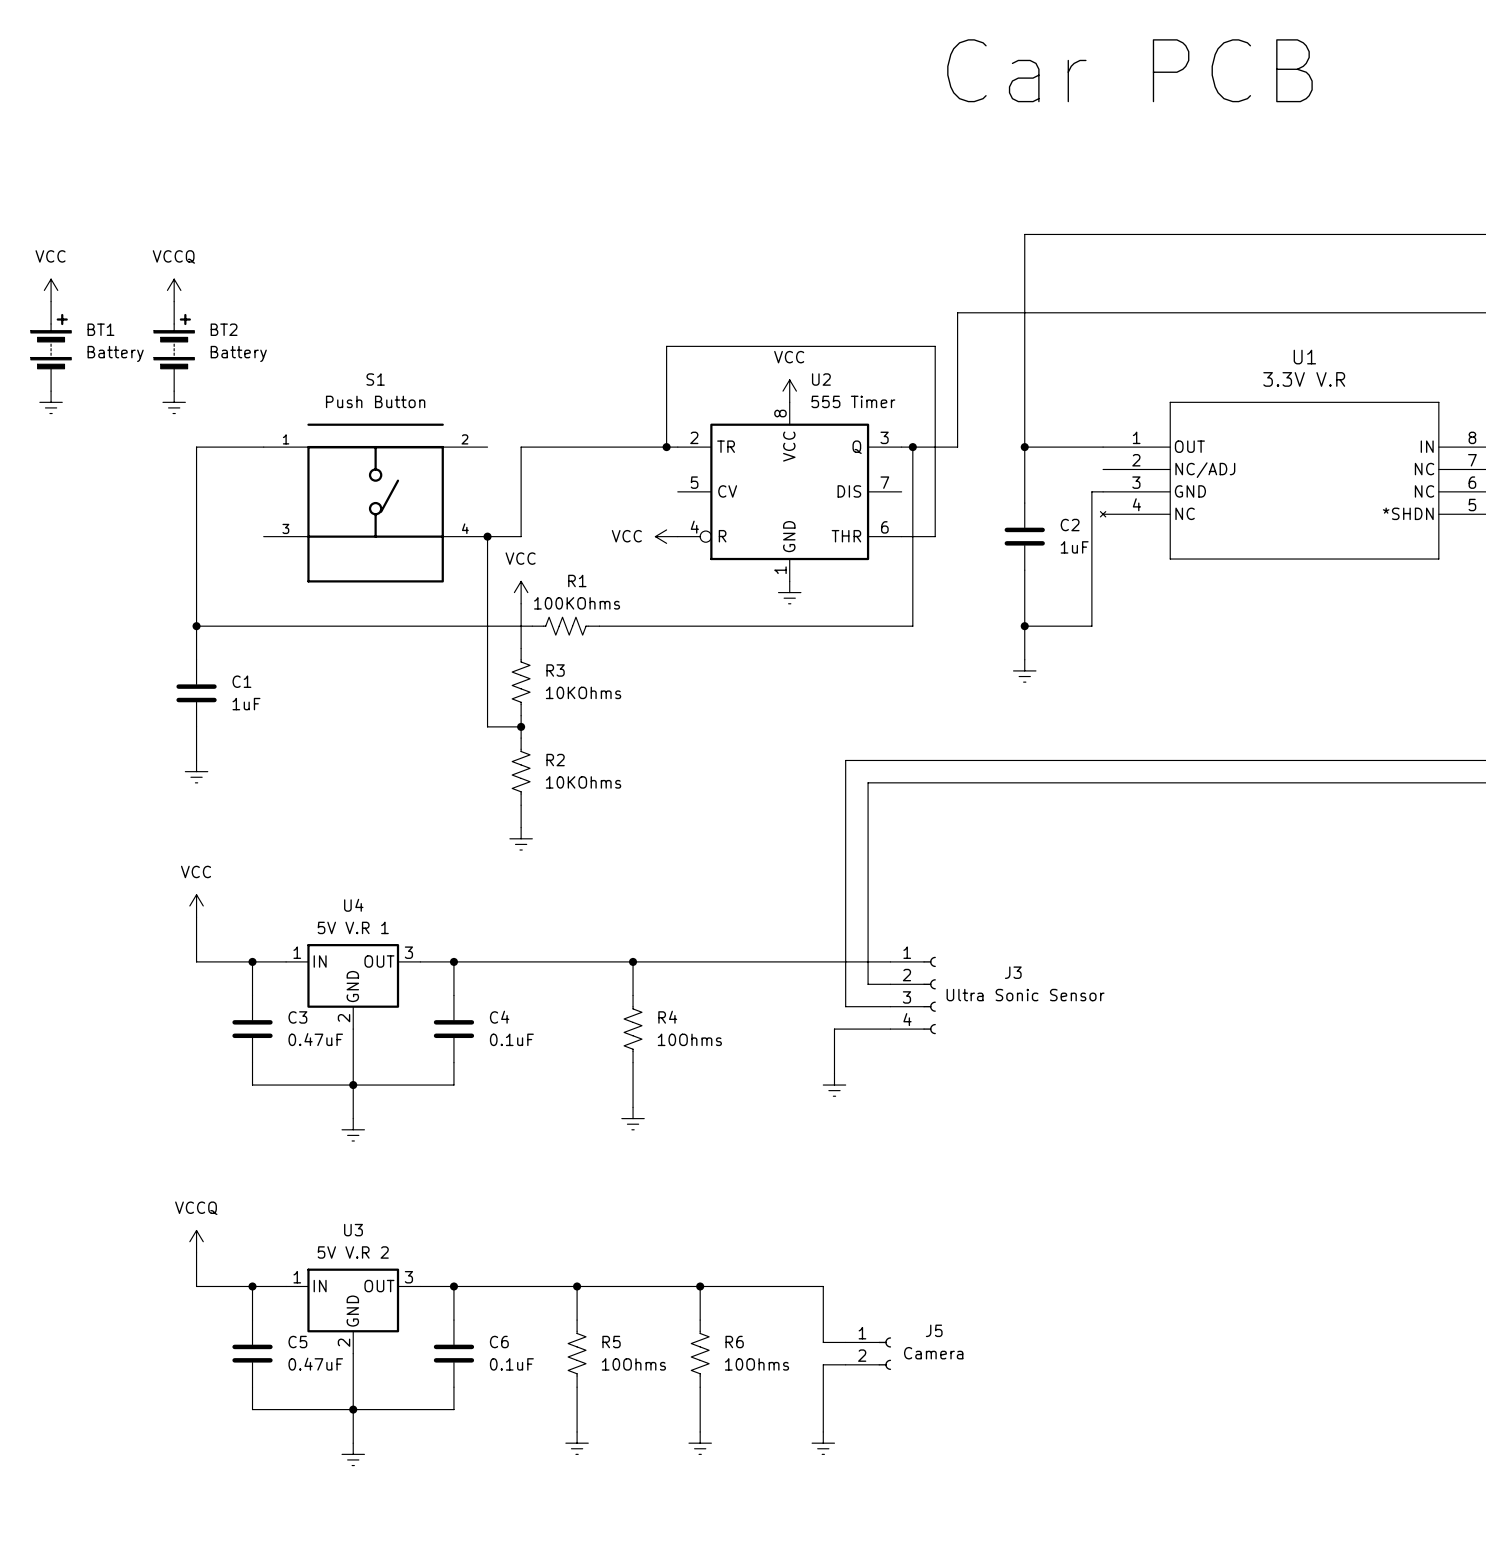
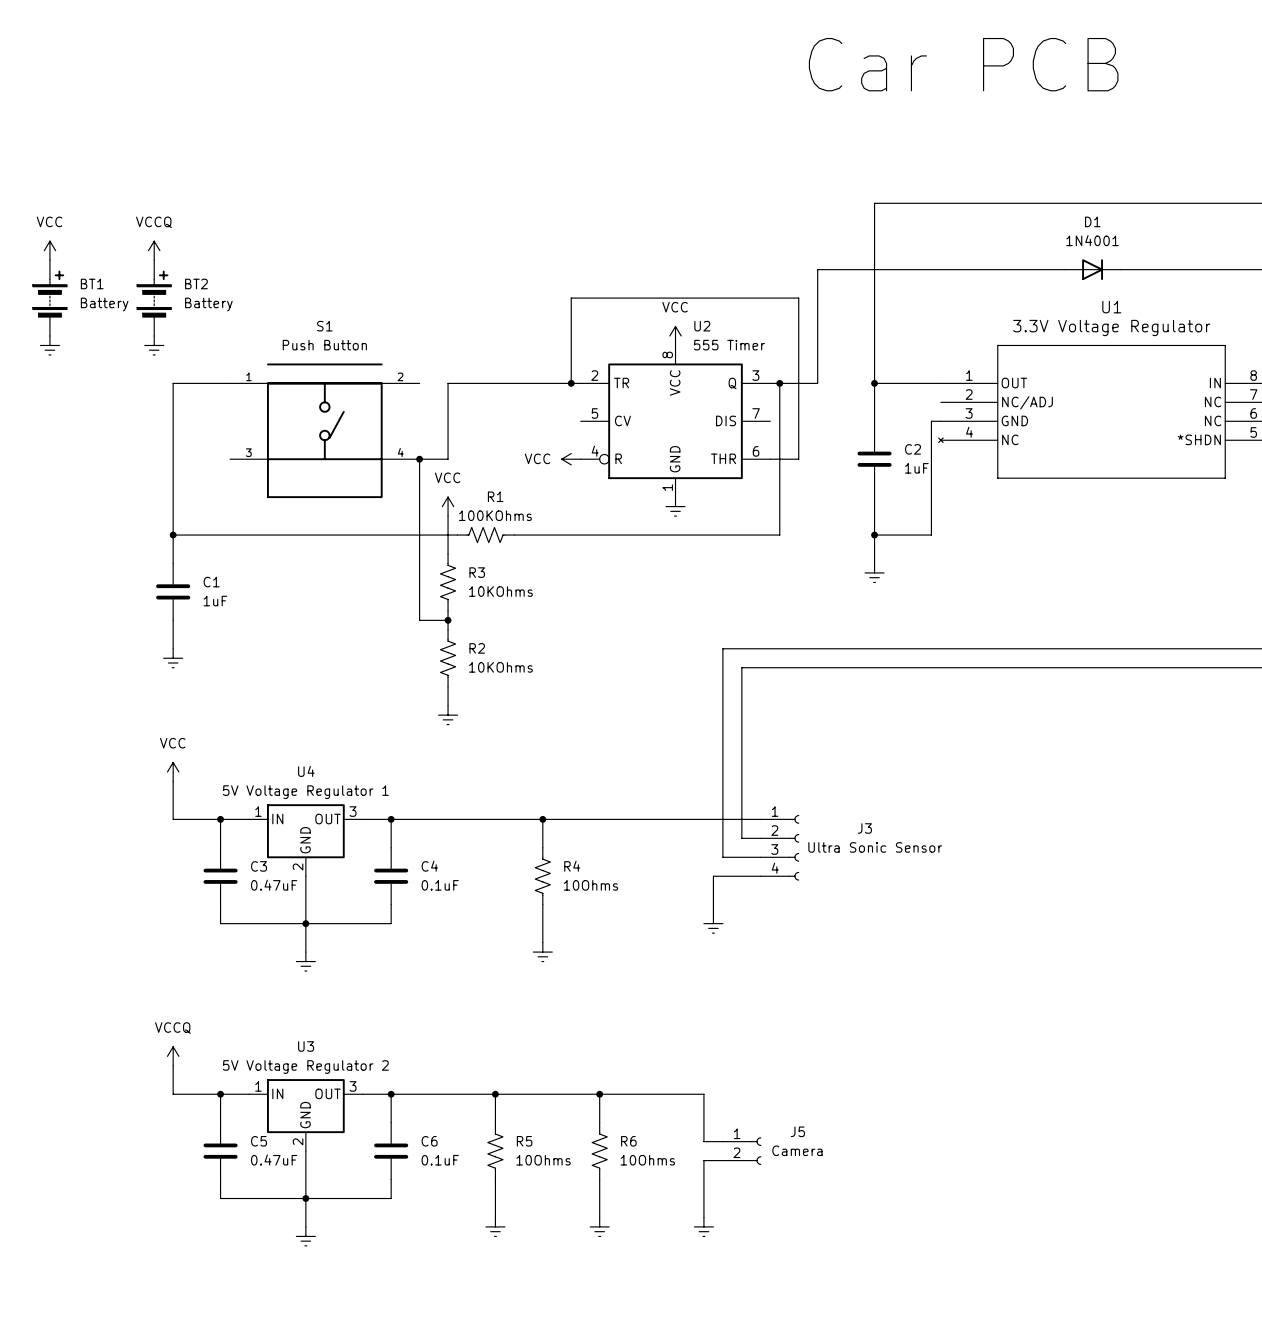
D1: none -> 1N4001 (1092, 269)
U1 value: 3.3V V.R (1304, 379) -> 3.3V Voltage Regulator (1111, 327)
U4 value: 5V V.R 1 (353, 927) -> 5V Voltage Regulator 1 (305, 792)
U3 value: 5V V.R 2 (353, 1252) -> 5V Voltage Regulator 2 (305, 1067)

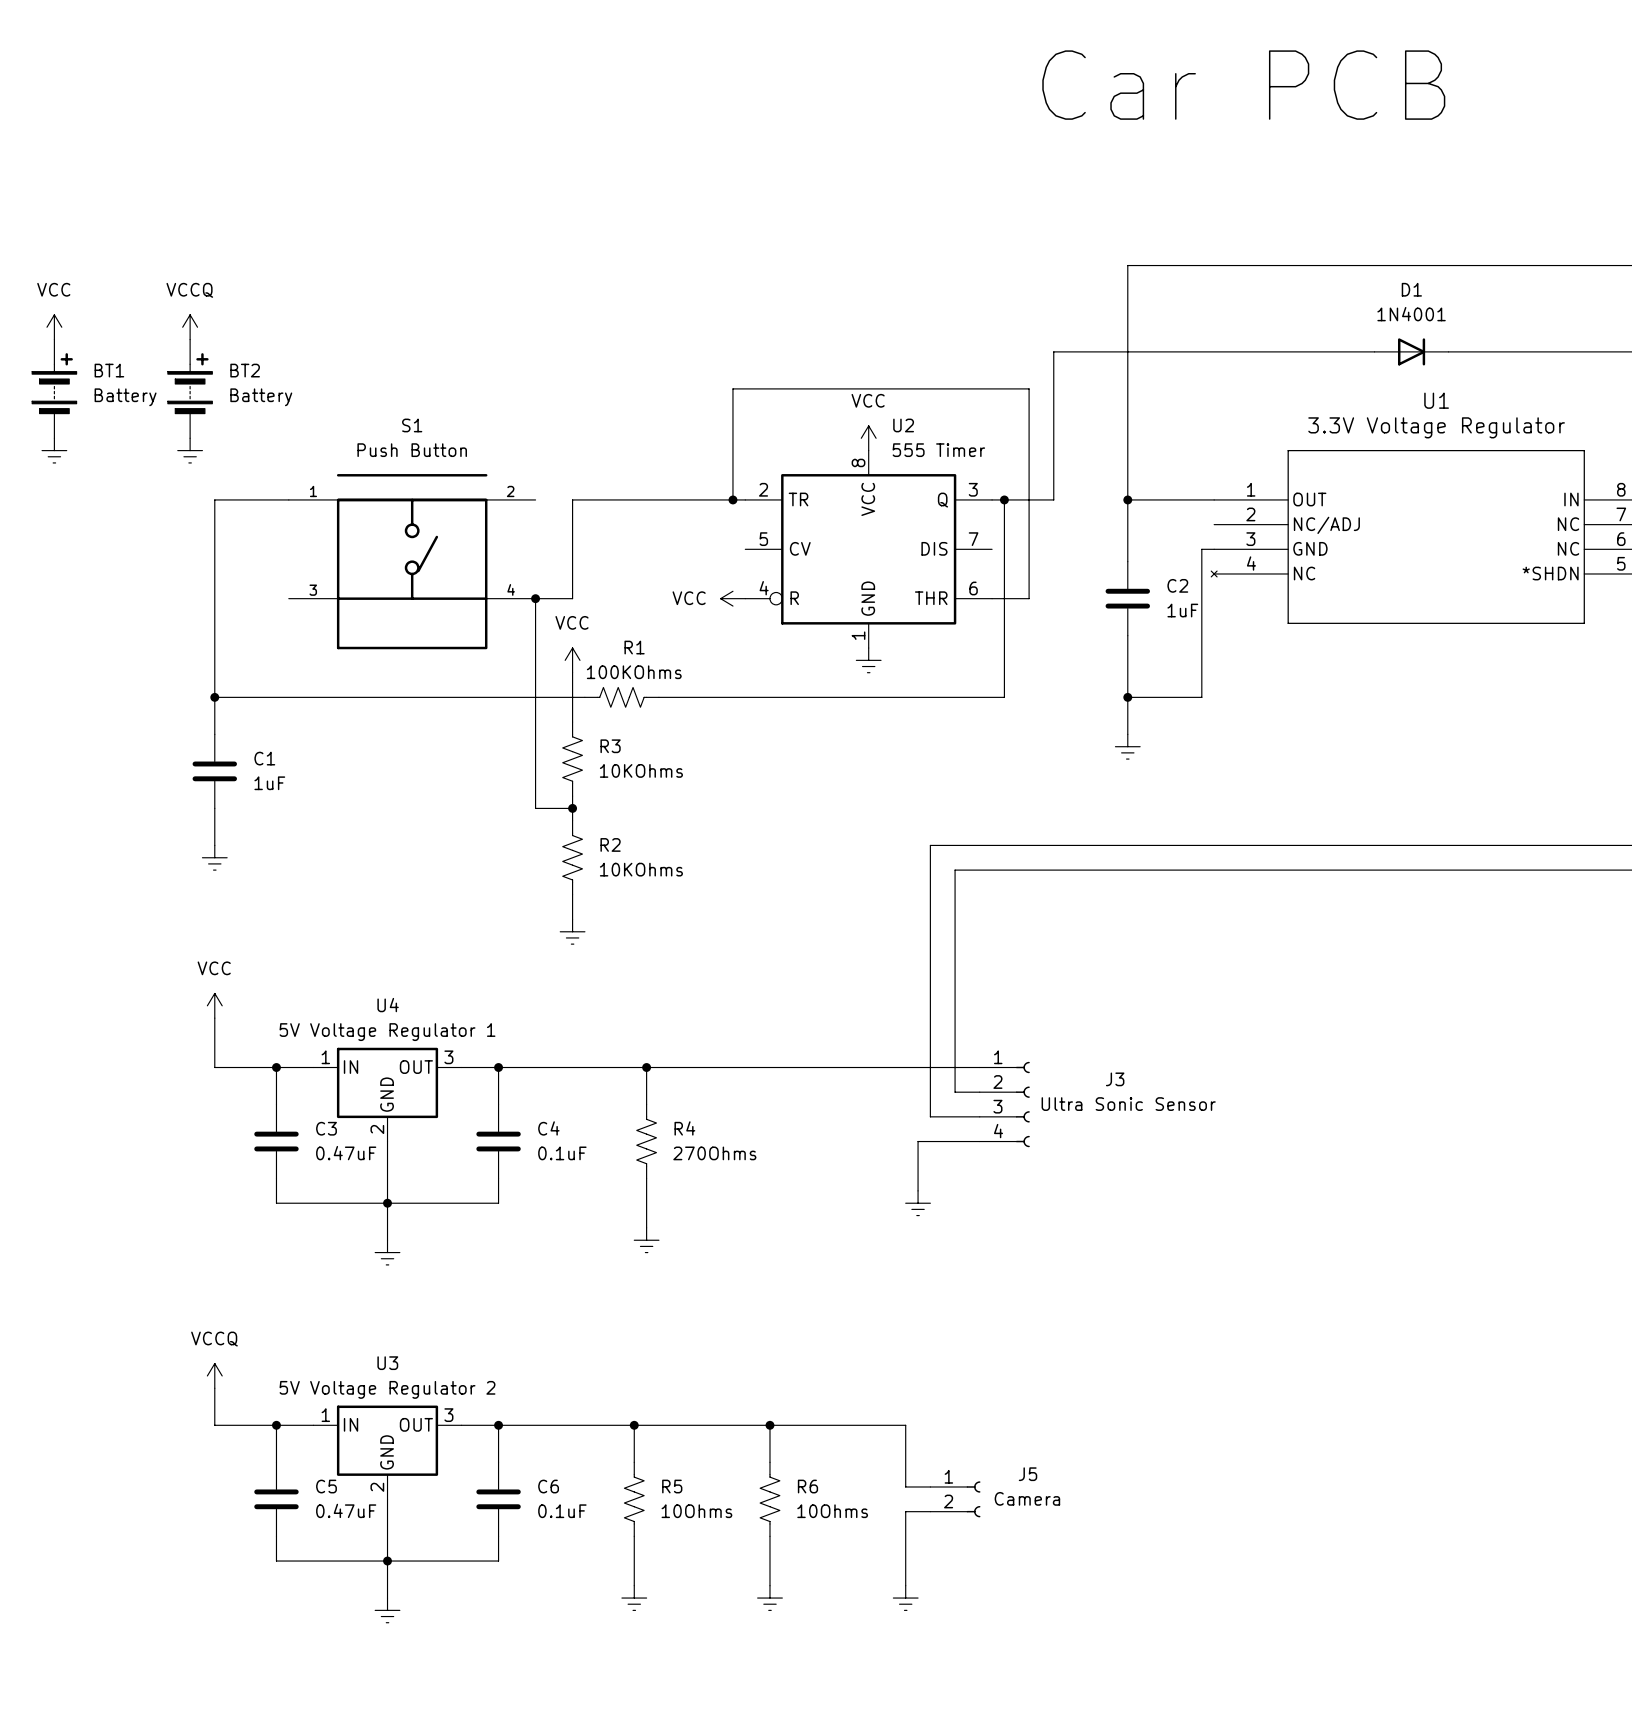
wire: (542, 819) (542, 847) -> (646, 1067) (646, 1104)
junction position: (542, 819) -> (646, 1067)
R4 position: (542, 876) -> (646, 1141)
R4 value: 10Ohms (590, 885) -> 270Ohms (714, 1153)
wire: (542, 904) (542, 942) -> (646, 1178) (646, 1227)
power symbol position: (542, 952) -> (646, 1240)

